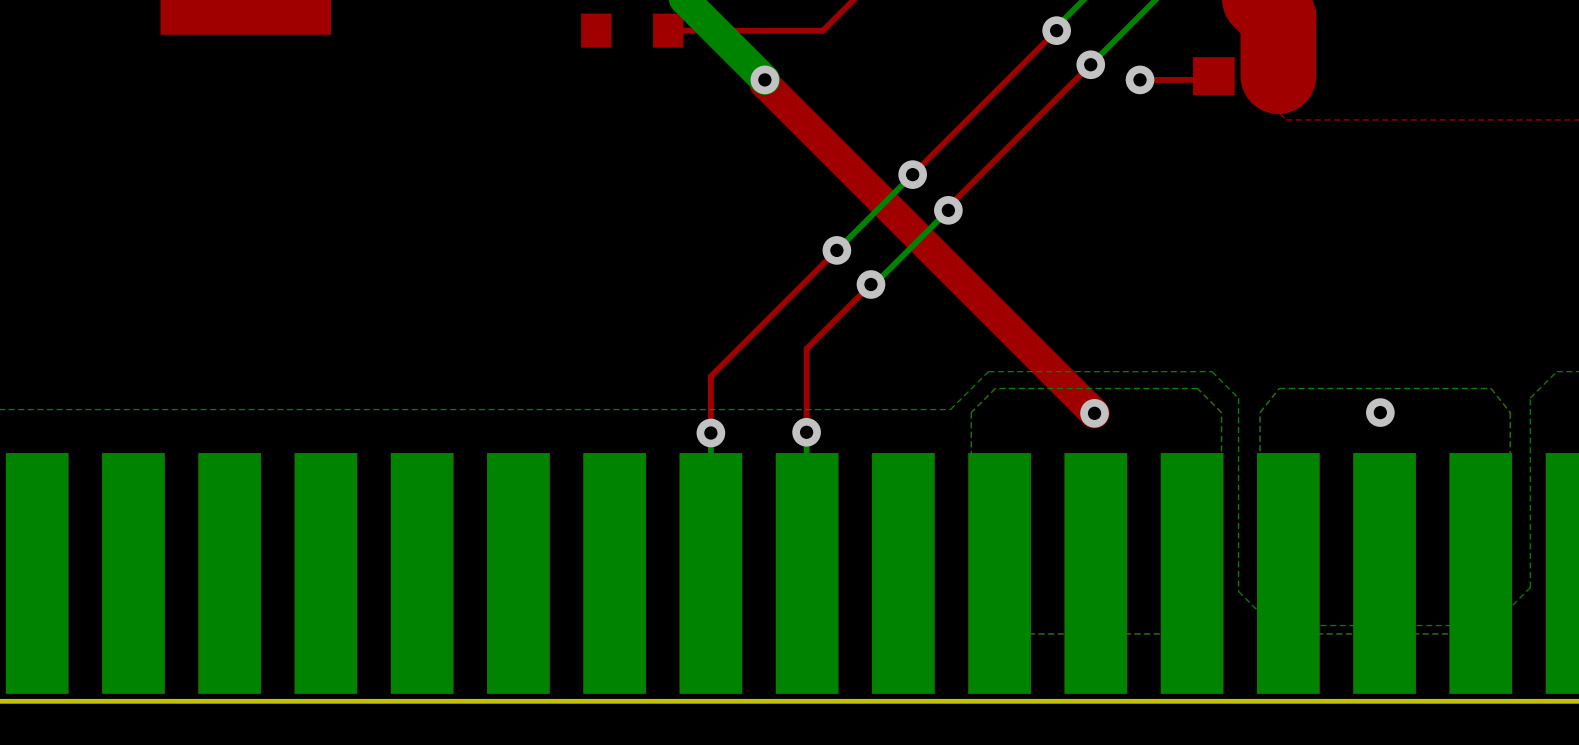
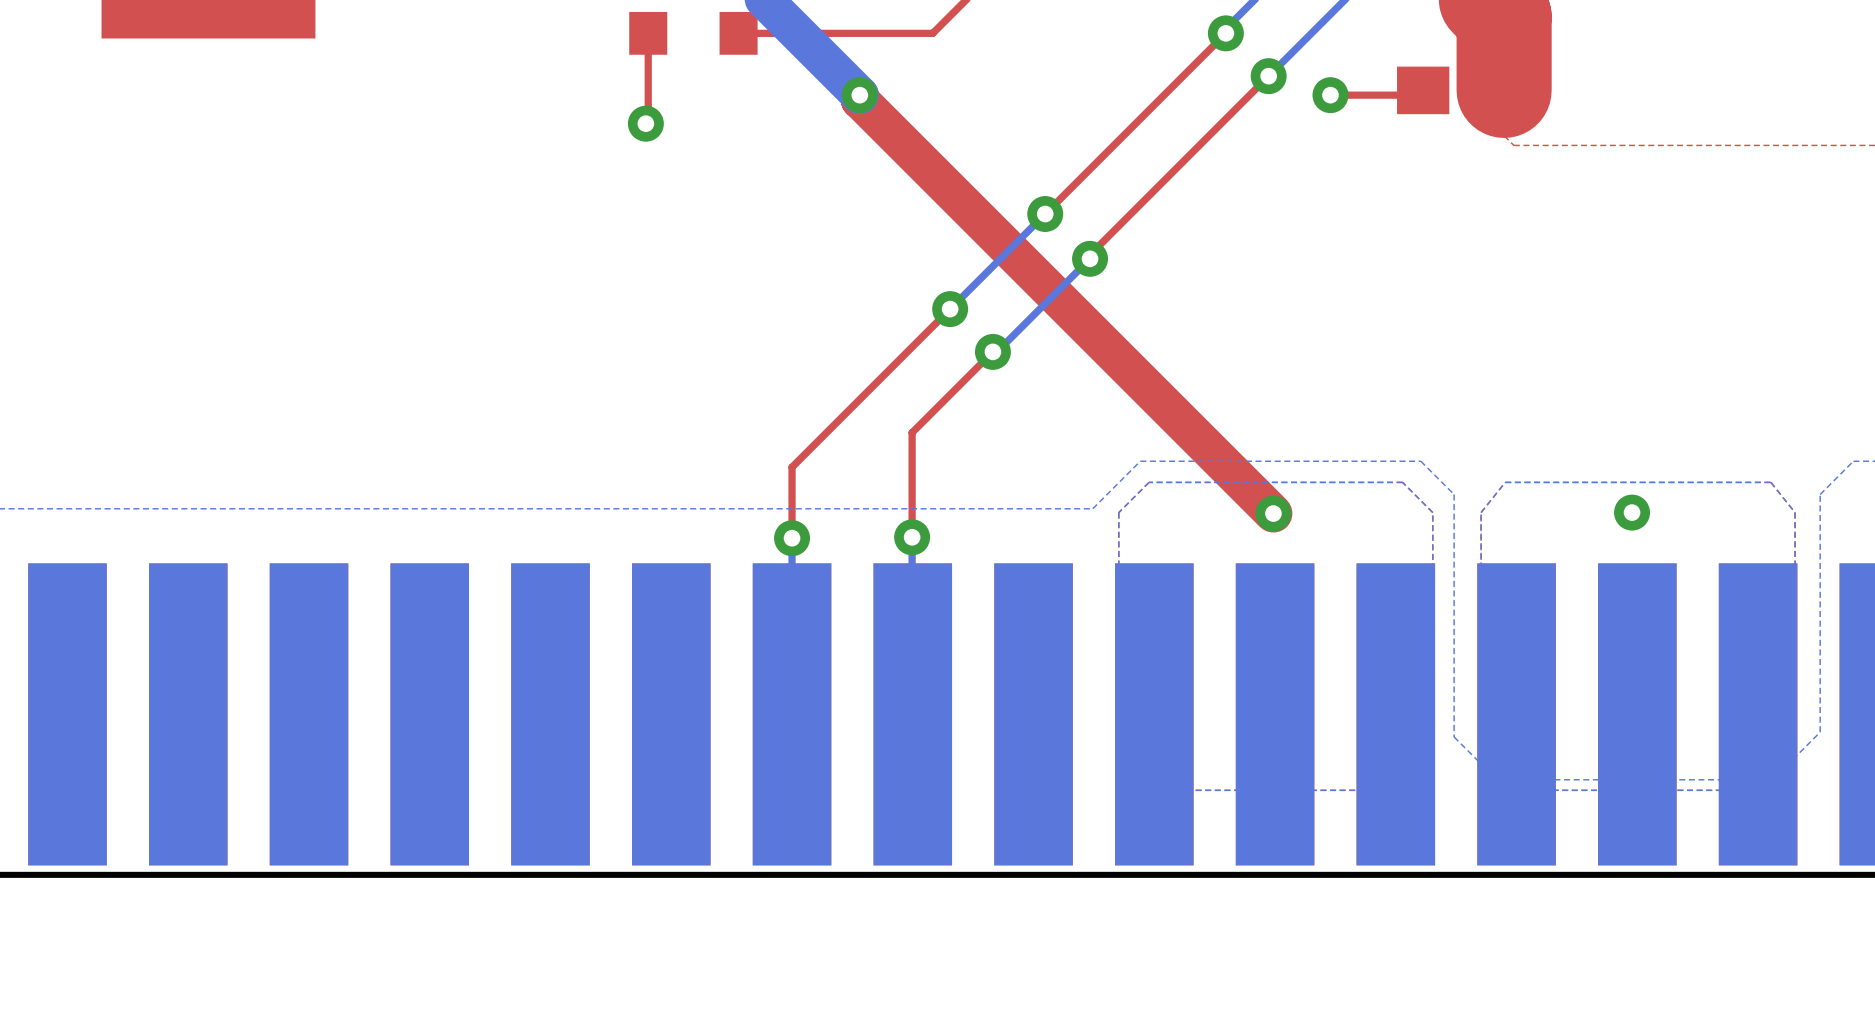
top track: none -> (648, 33) (648, 121) (645, 123)
via: none -> (645, 123)

